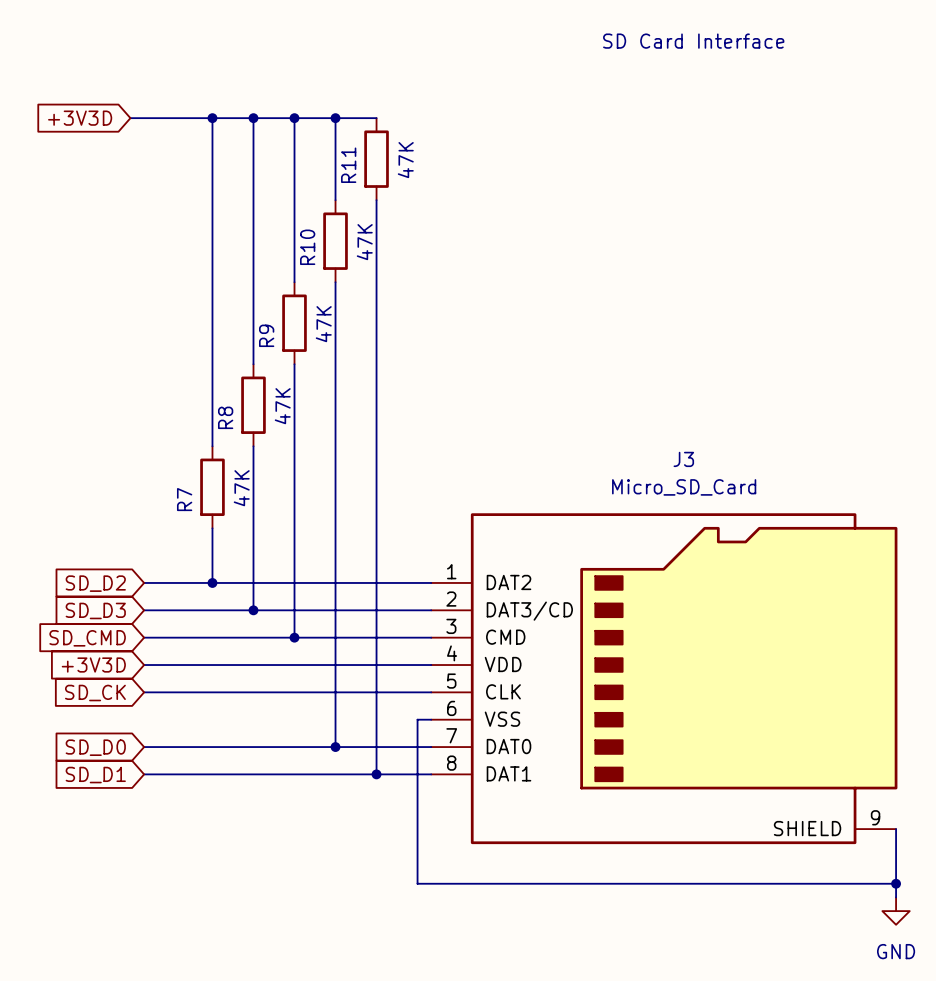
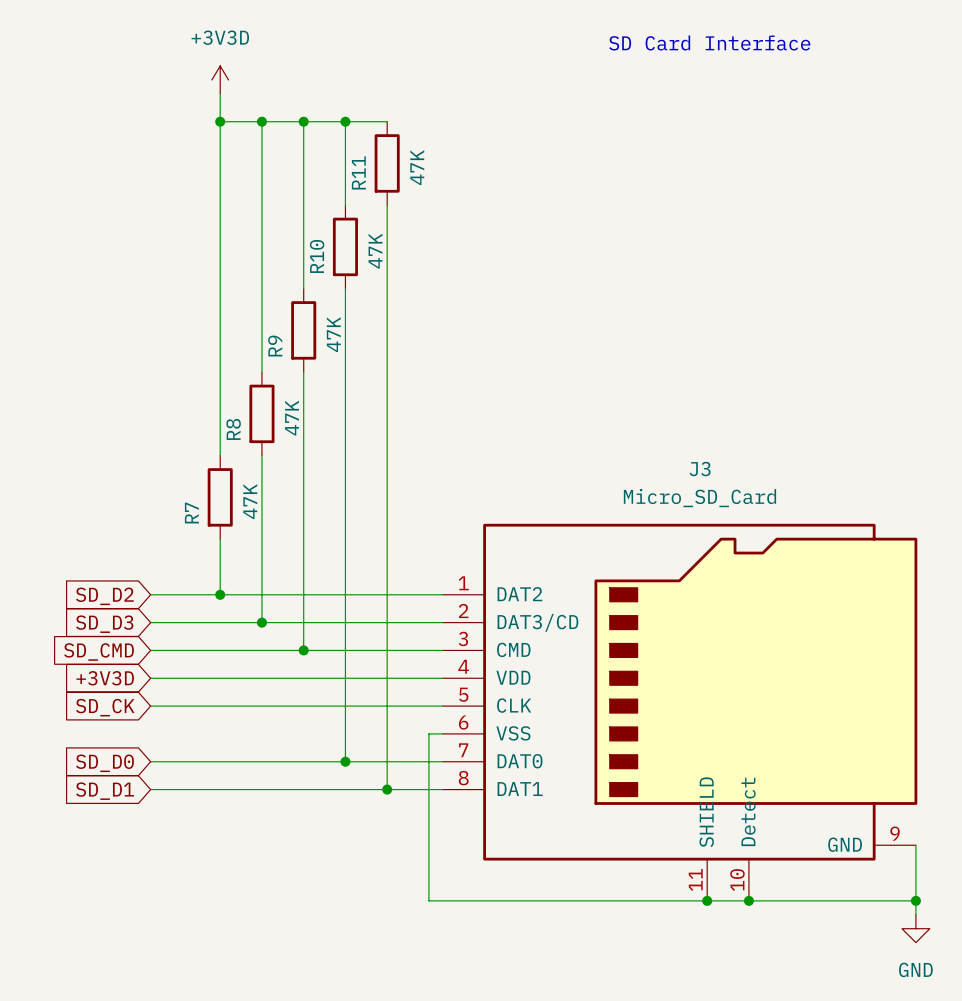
power symbol: none -> +3V3D (220, 79)
global label: +3V3D (80, 118) -> none
wire: (130, 118) (212, 118) -> (220, 93) (220, 121)
J3 symbol: [431, 513, 898, 845] -> [442, 523, 918, 901]
junction: none -> (707, 900)
junction: none -> (748, 900)

